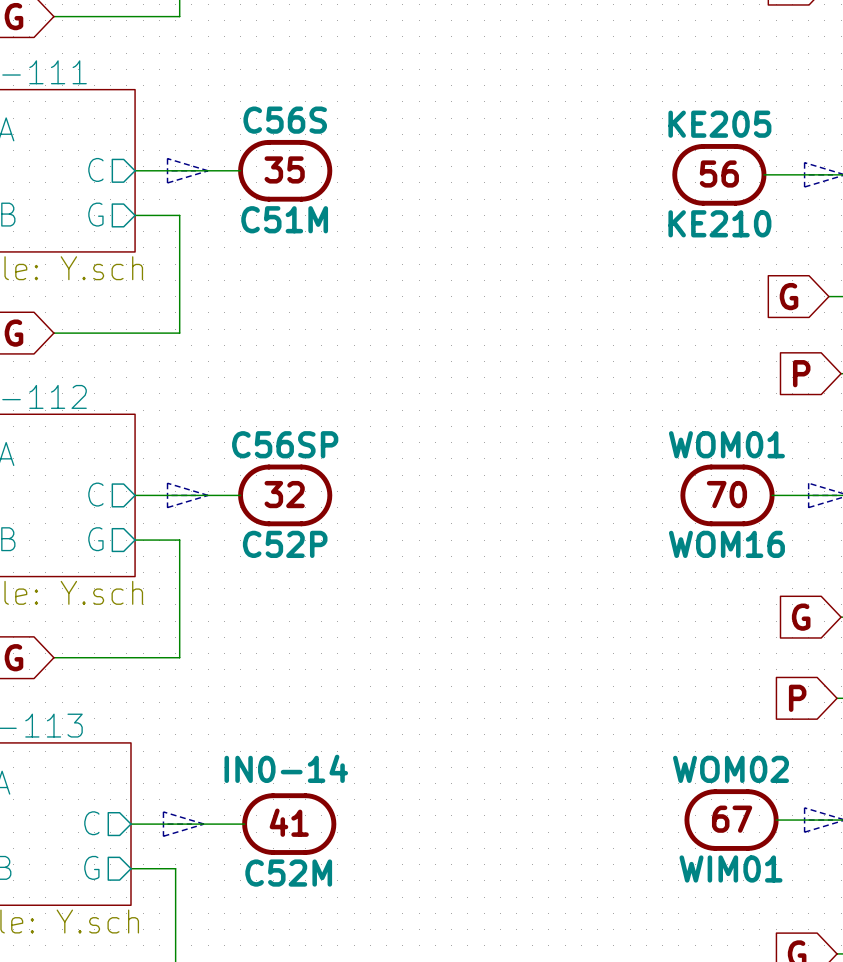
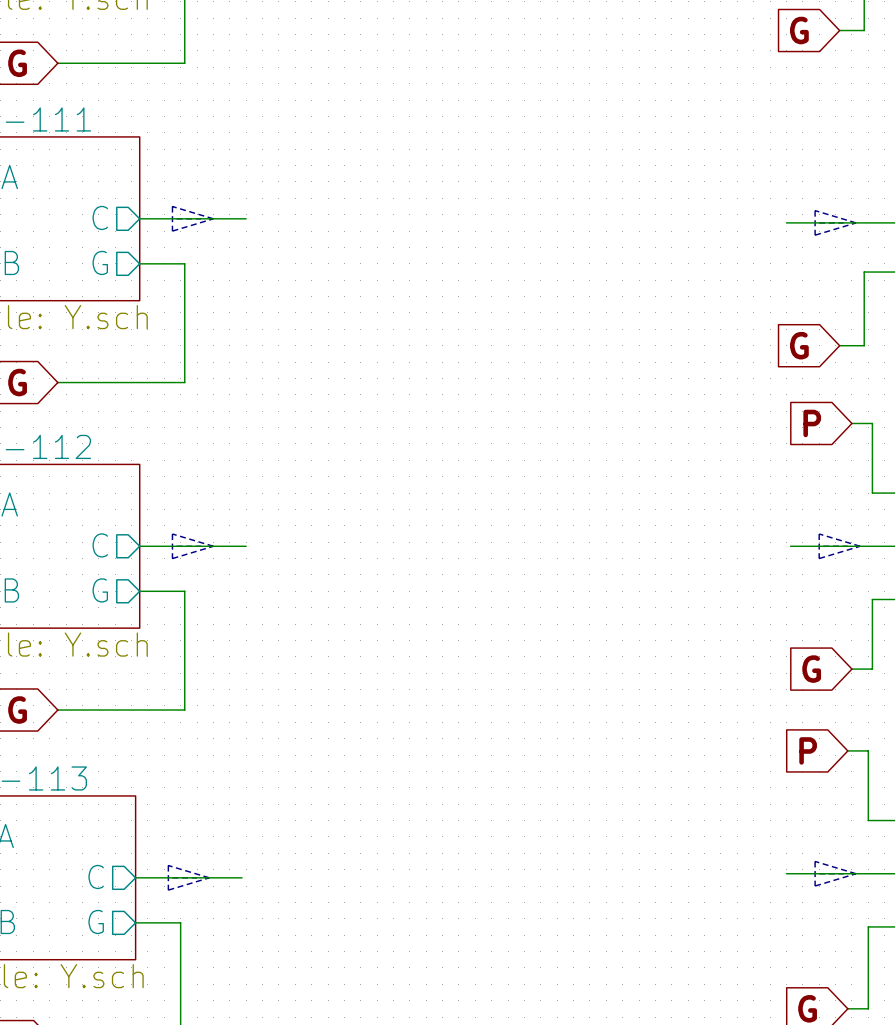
part: (285, 170) -> none
part: (719, 174) -> none
wire: (764, 174) (776, 174) -> none
part: (285, 495) -> none
part: (727, 495) -> none
wire: (772, 495) (780, 495) -> none
part: (731, 820) -> none
wire: (236, 824) (244, 824) -> none
part: (289, 824) -> none

